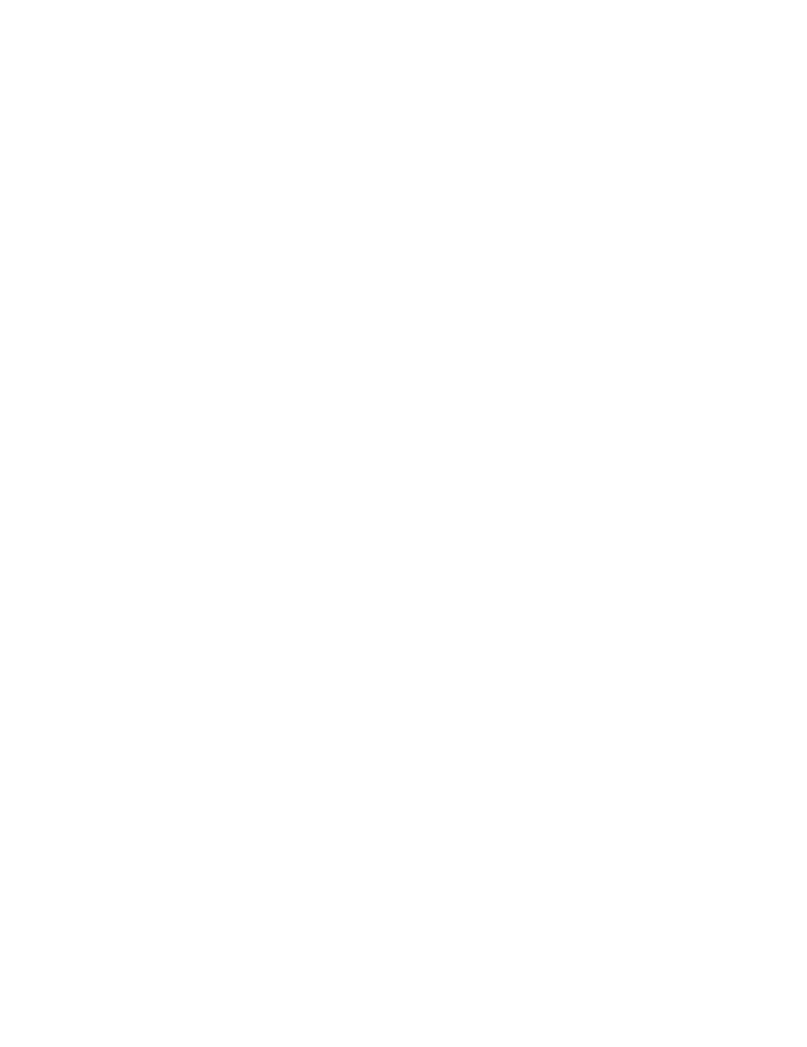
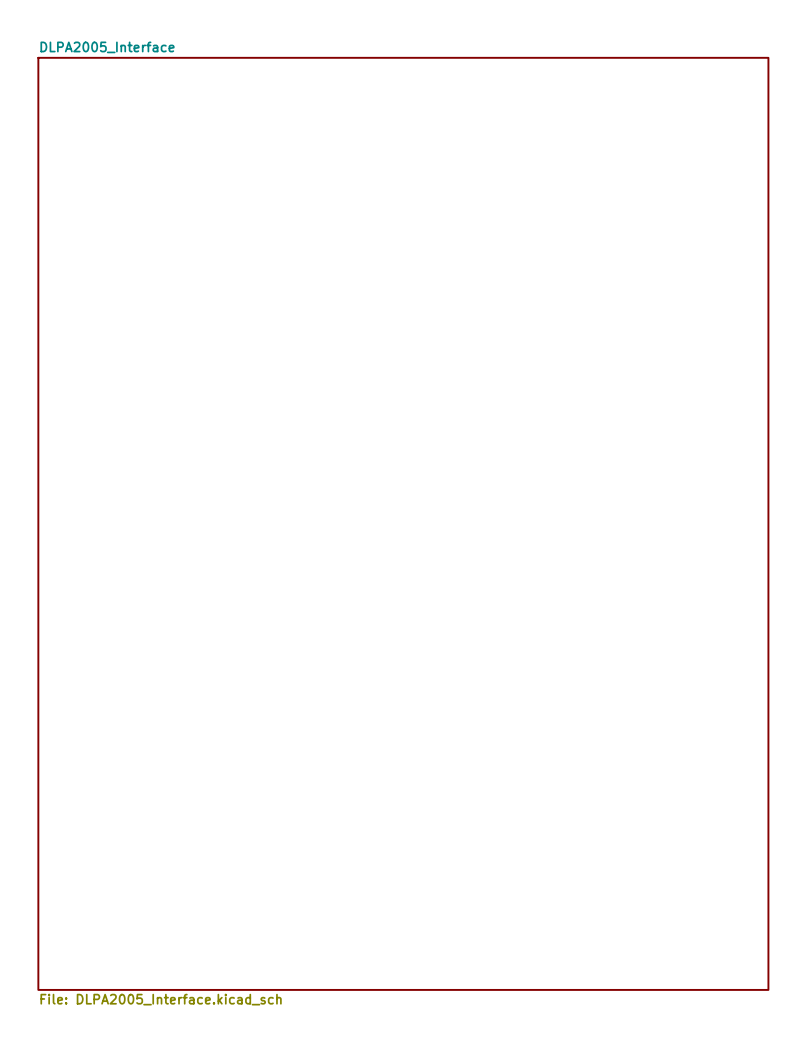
sheet DLPA2005_Interface: none -> File: DLPA2005_Interface.kicad_sch (403, 523)

